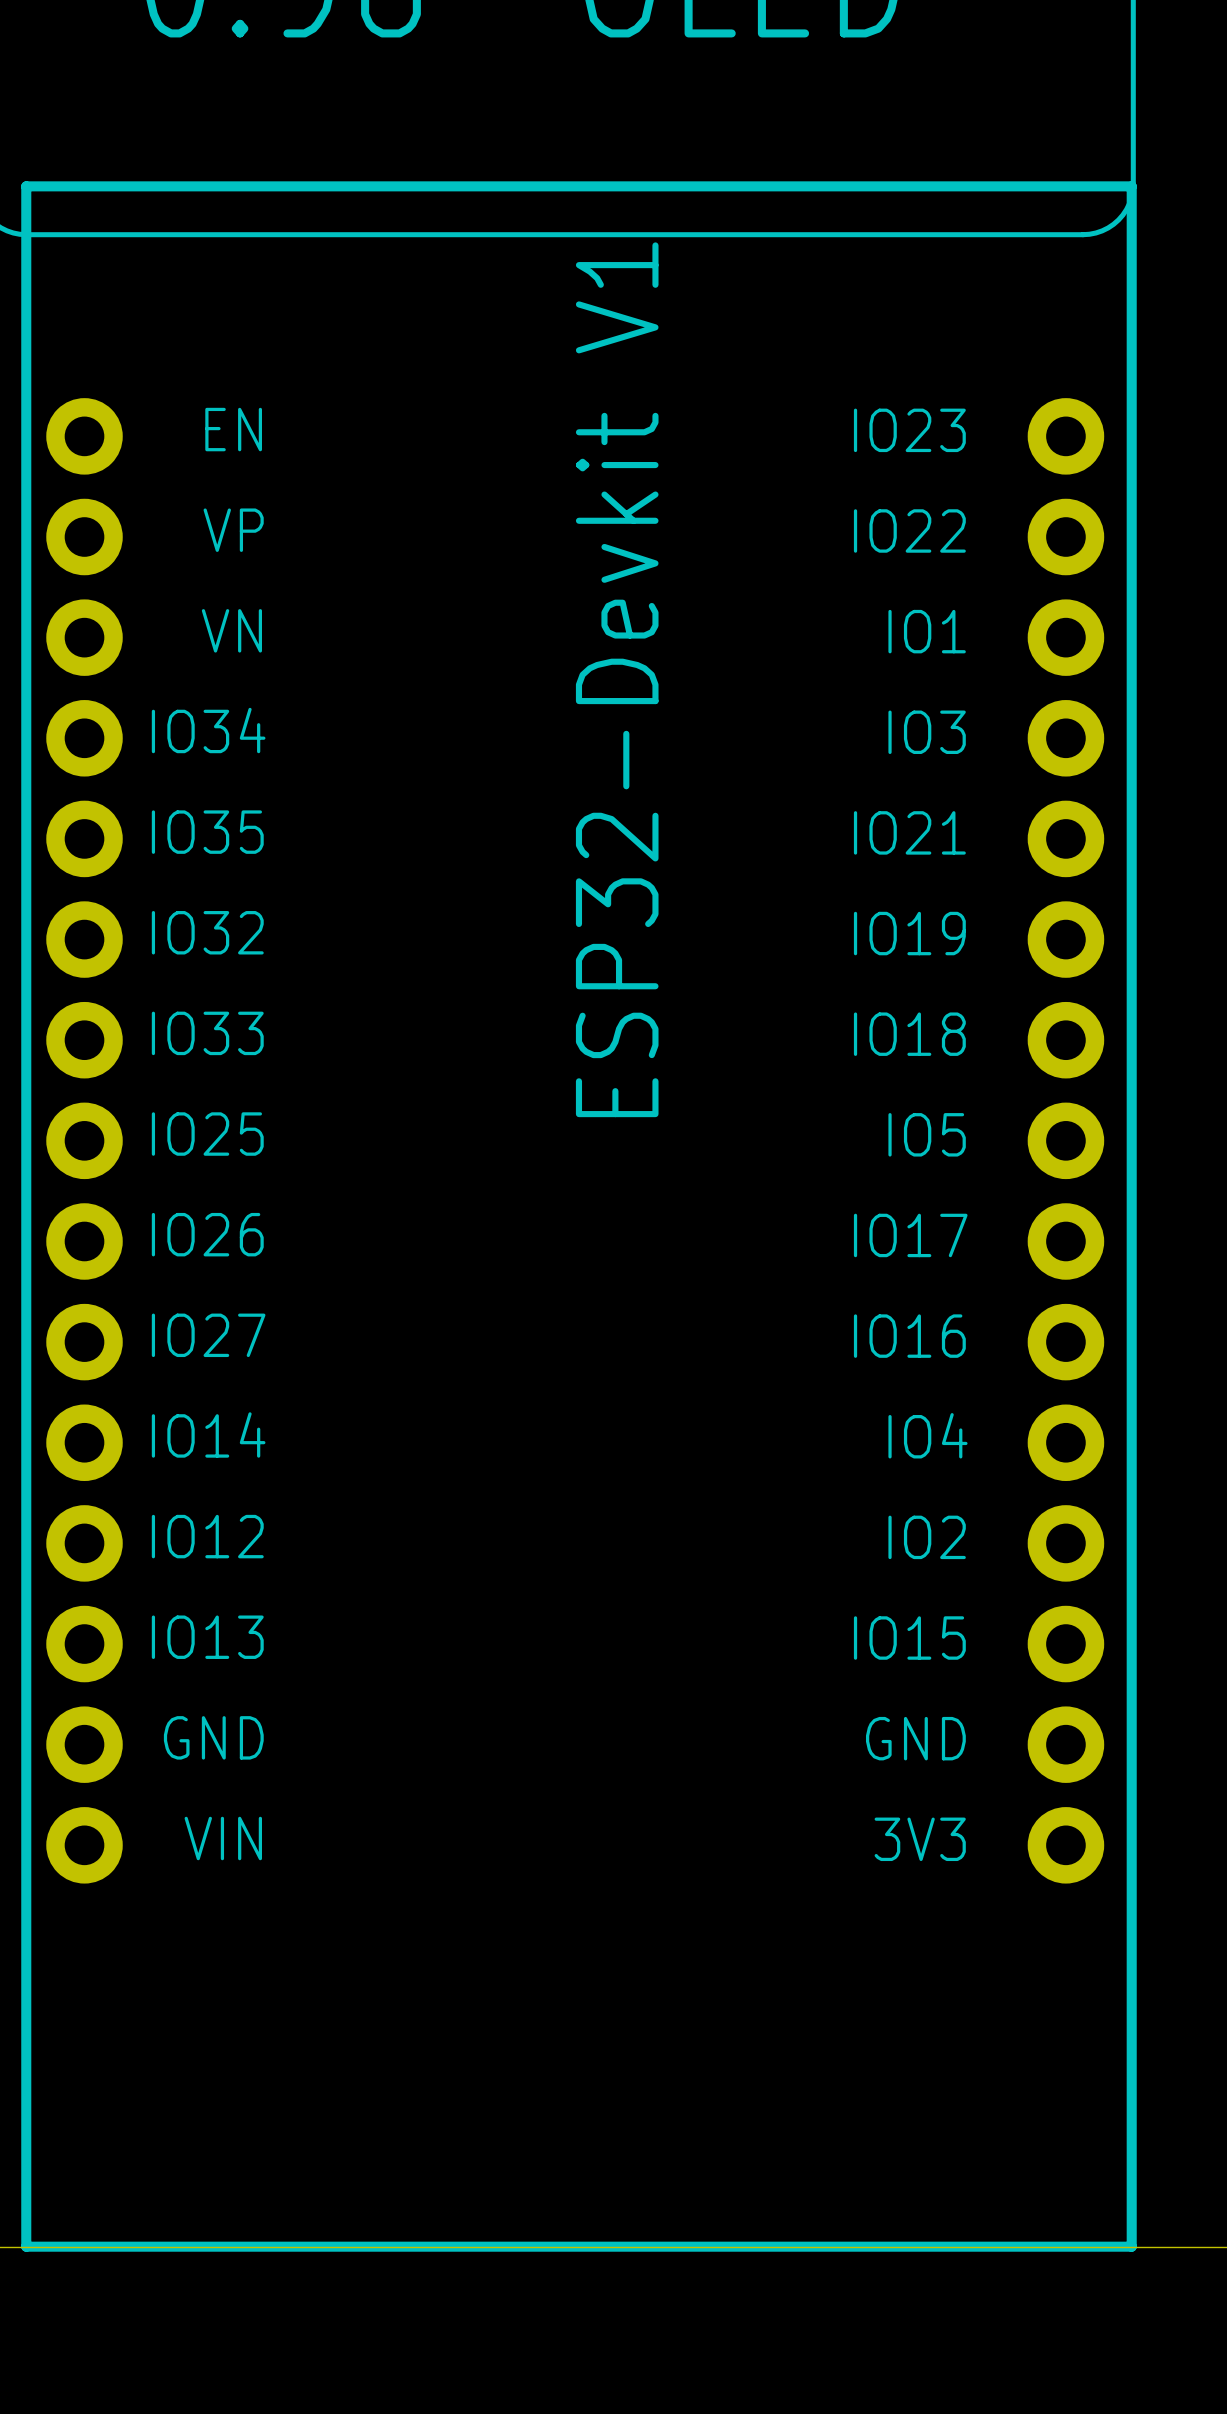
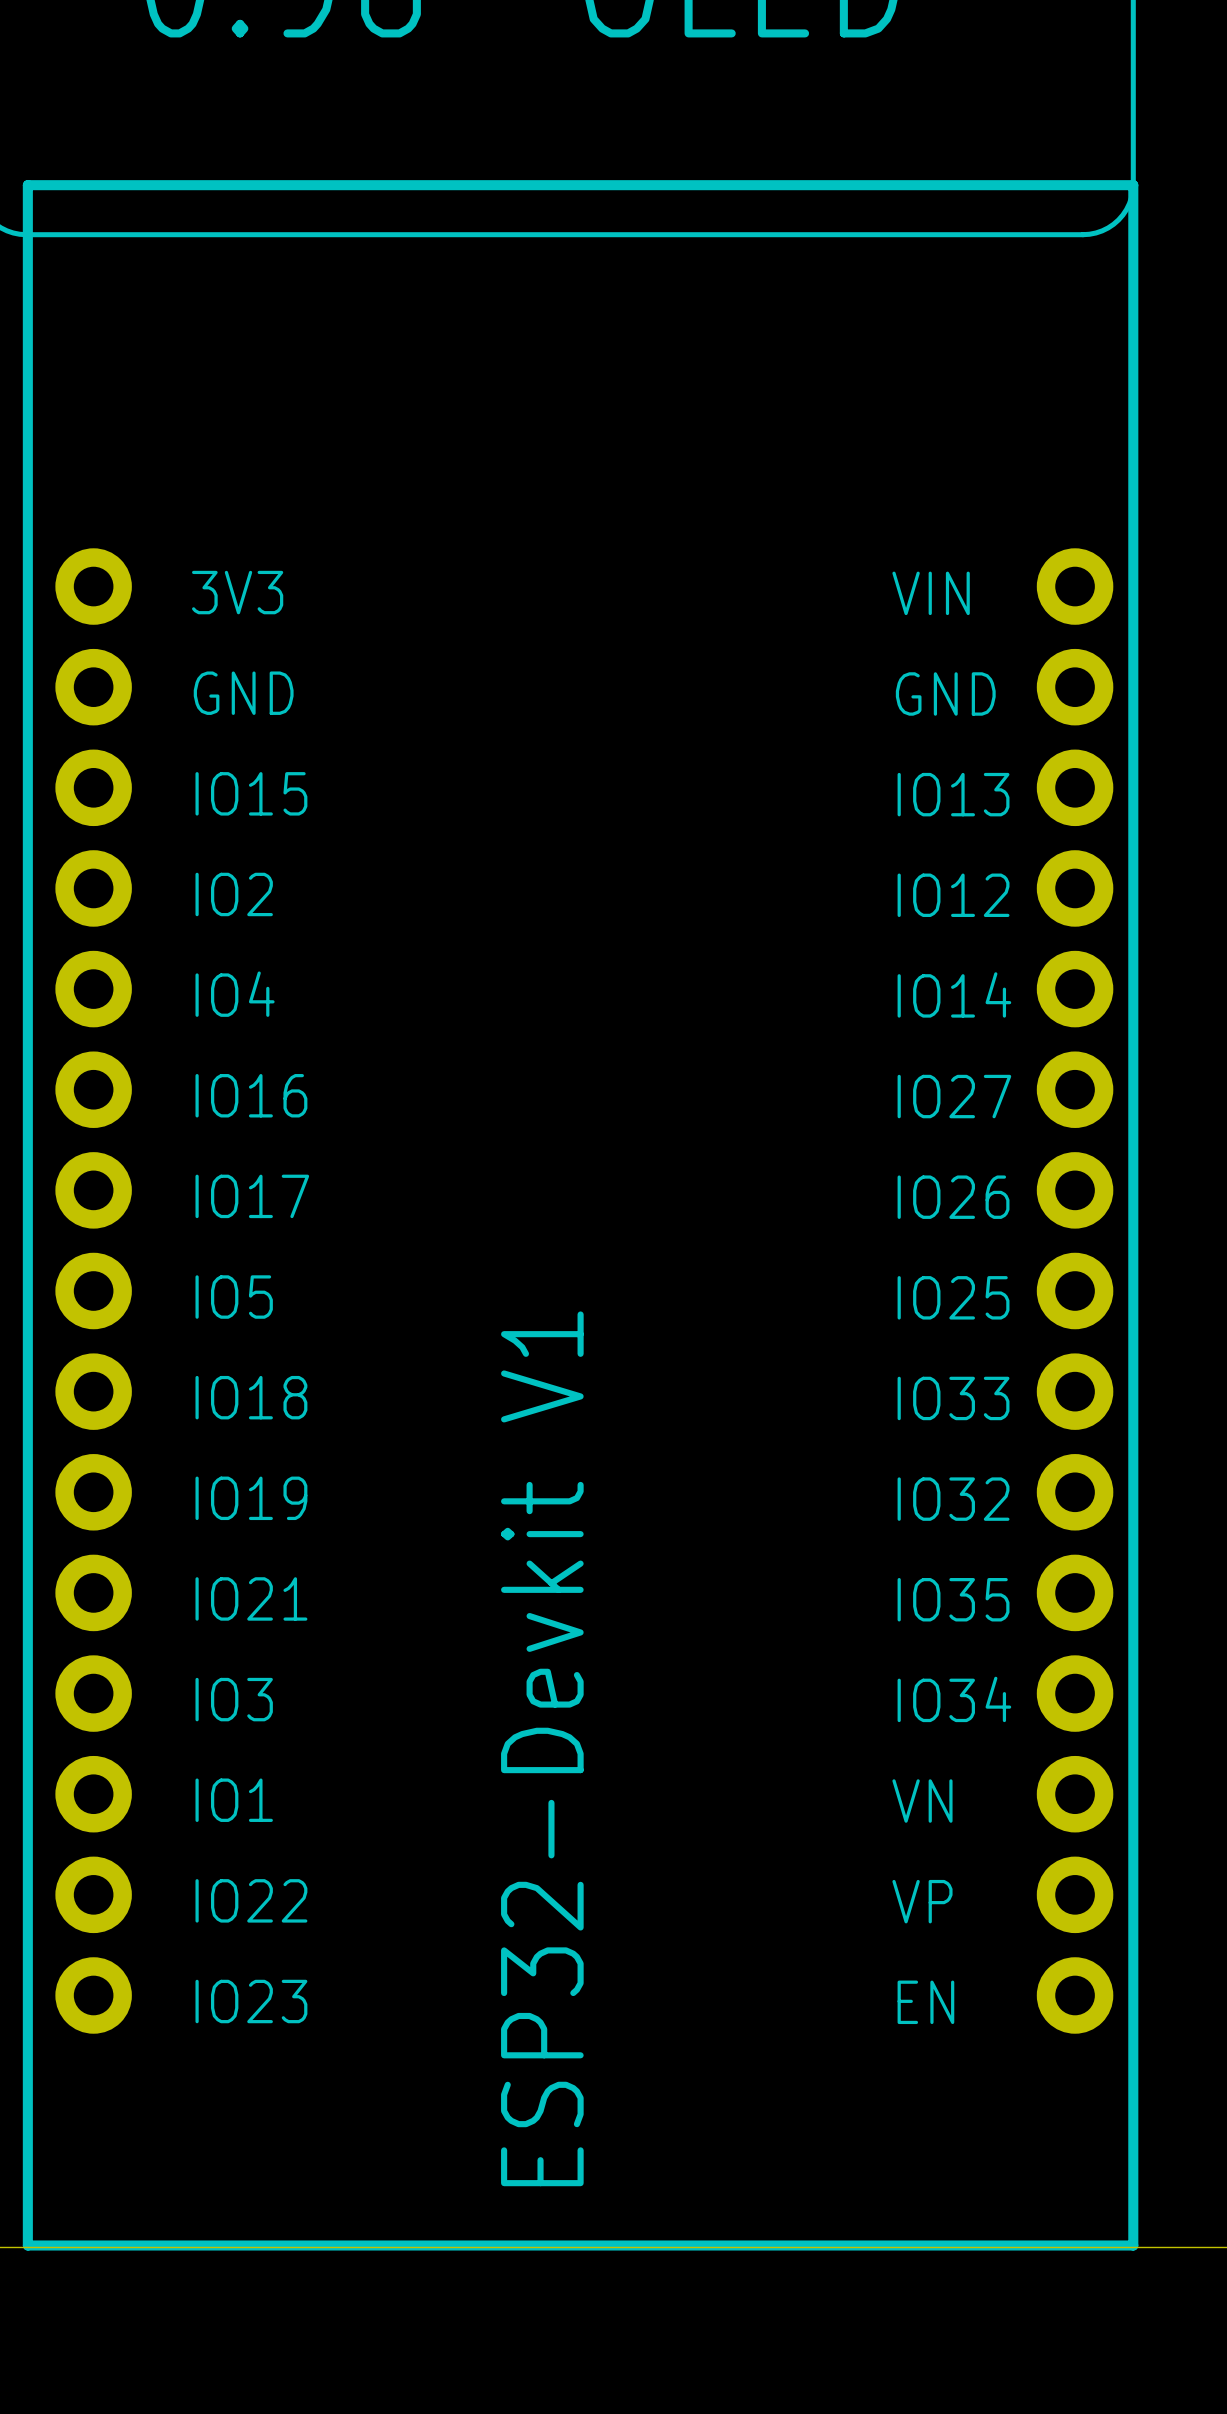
part footprint: [21, 181, 1137, 2252] -> [22, 180, 1139, 2251]

